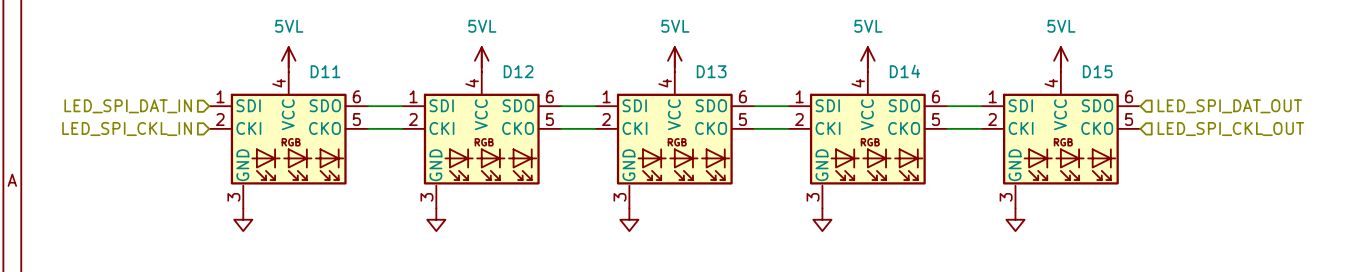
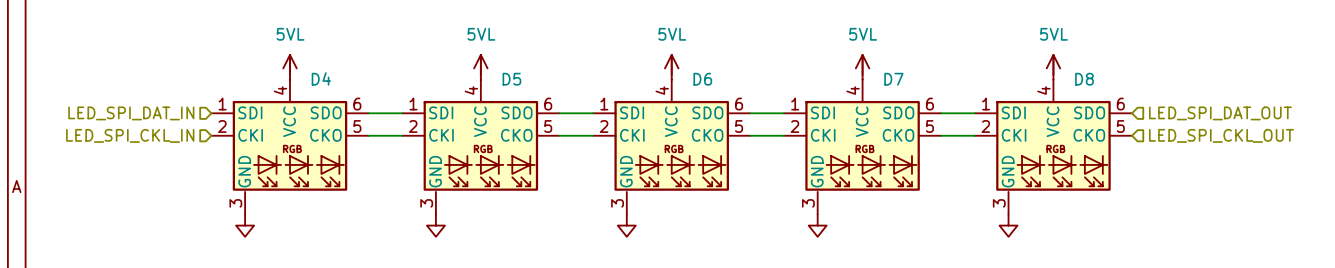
D11 name: D11 (325, 71) -> D4 (321, 78)
D12 name: D12 (518, 71) -> D5 (511, 79)
D13 name: D13 (711, 71) -> D6 (702, 79)
D14 name: D14 (904, 71) -> D7 (893, 79)
D15 name: D15 (1097, 71) -> D8 (1084, 79)

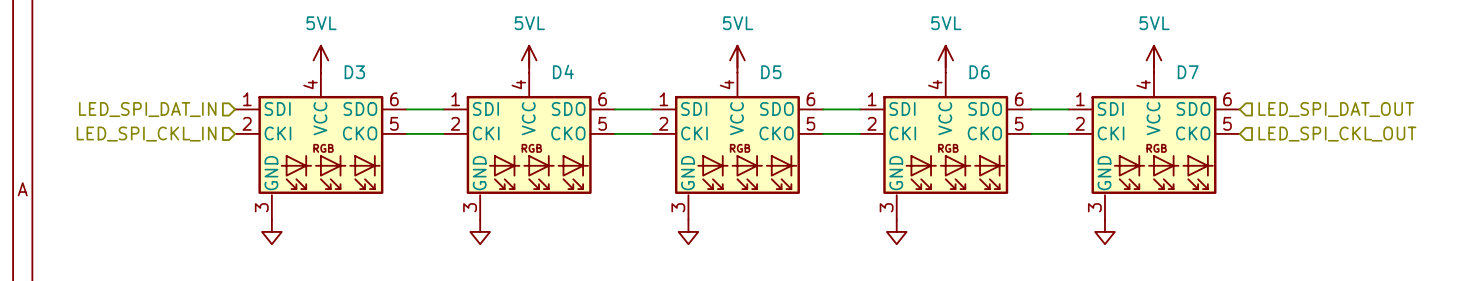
D4 name: D4 (321, 78) -> D3 (354, 72)
D5 name: D5 (511, 79) -> D4 (563, 71)
D6 name: D6 (702, 79) -> D5 (771, 72)
D7 name: D7 (893, 79) -> D6 (979, 72)
D8 name: D8 (1084, 79) -> D7 (1188, 72)

